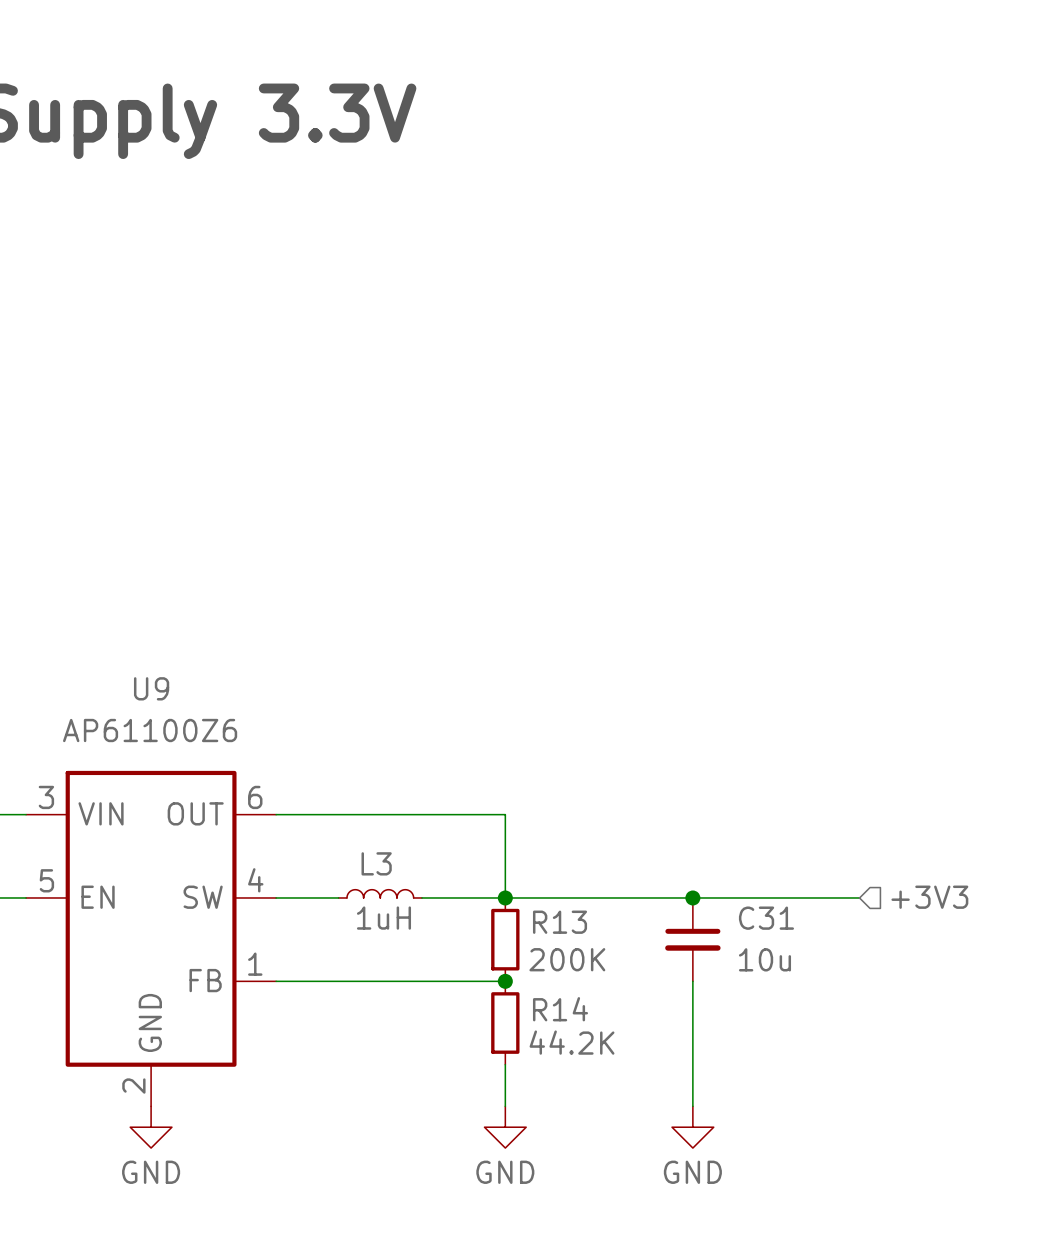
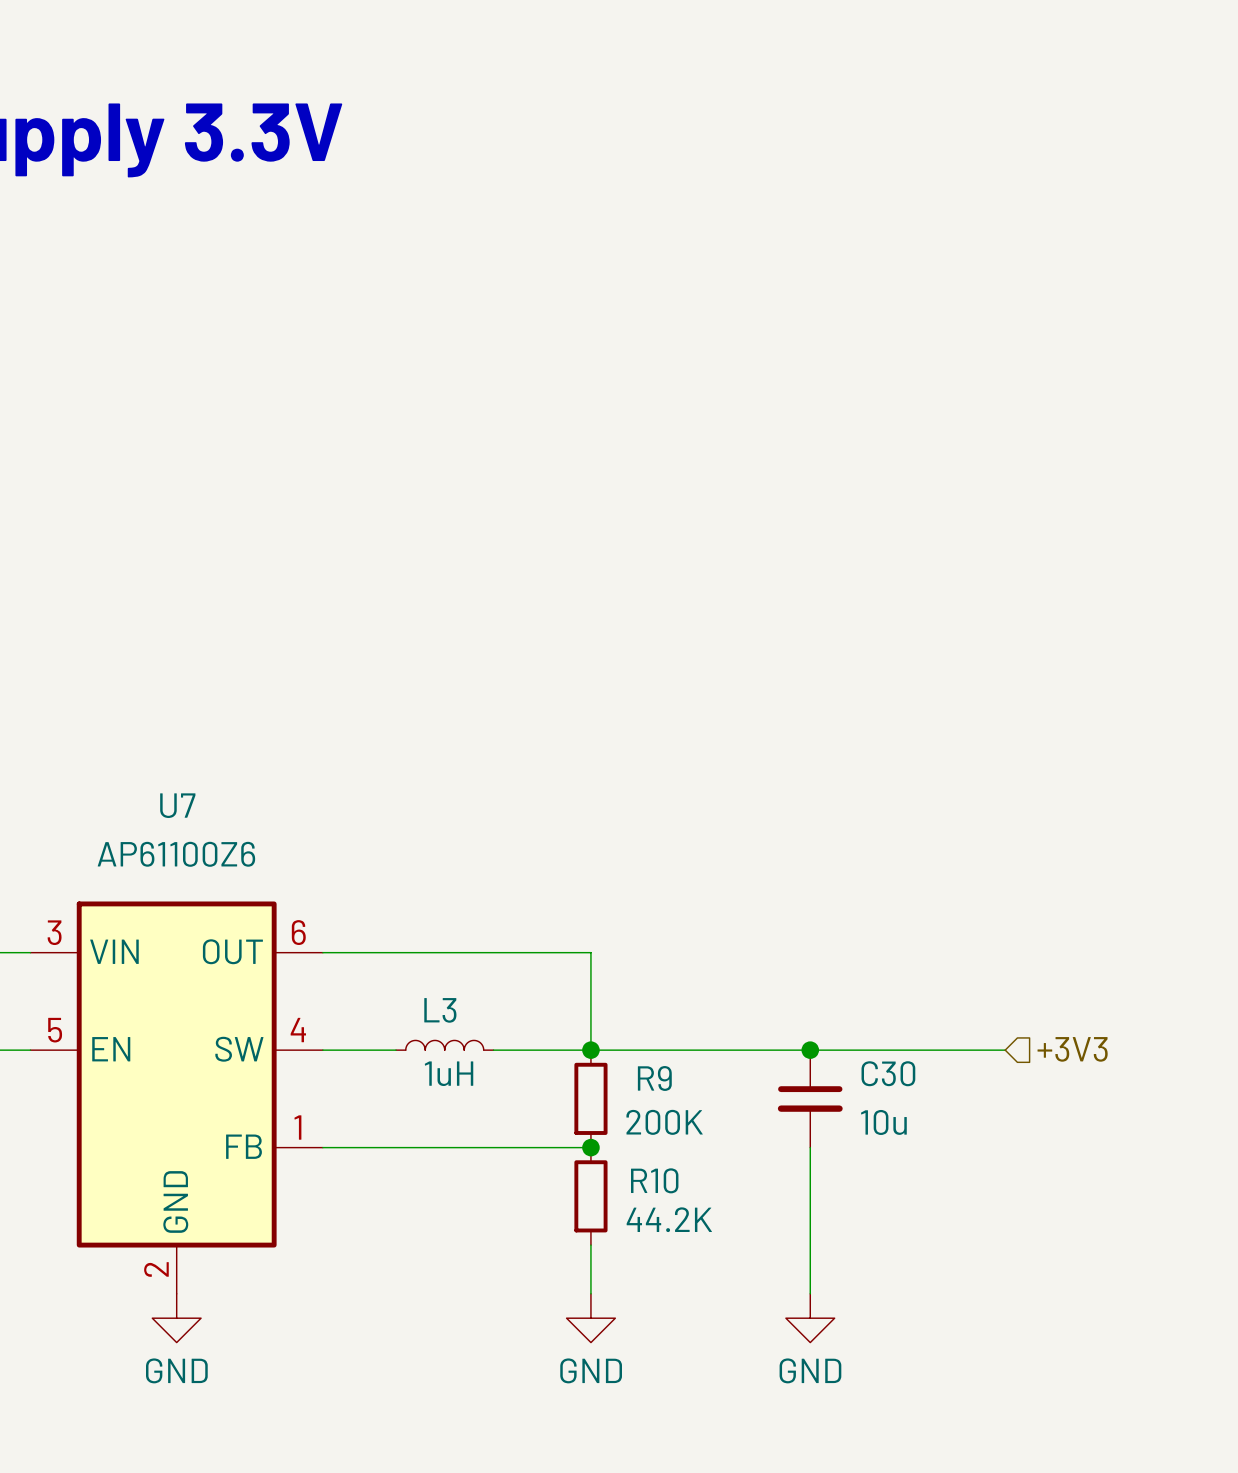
U9 name: U9 (151, 688) -> U7 (177, 805)
C31 name: C31 (766, 918) -> C30 (888, 1073)
R13 name: R13 (560, 922) -> R9 (654, 1078)
R14 name: R14 (560, 1009) -> R10 (654, 1180)

